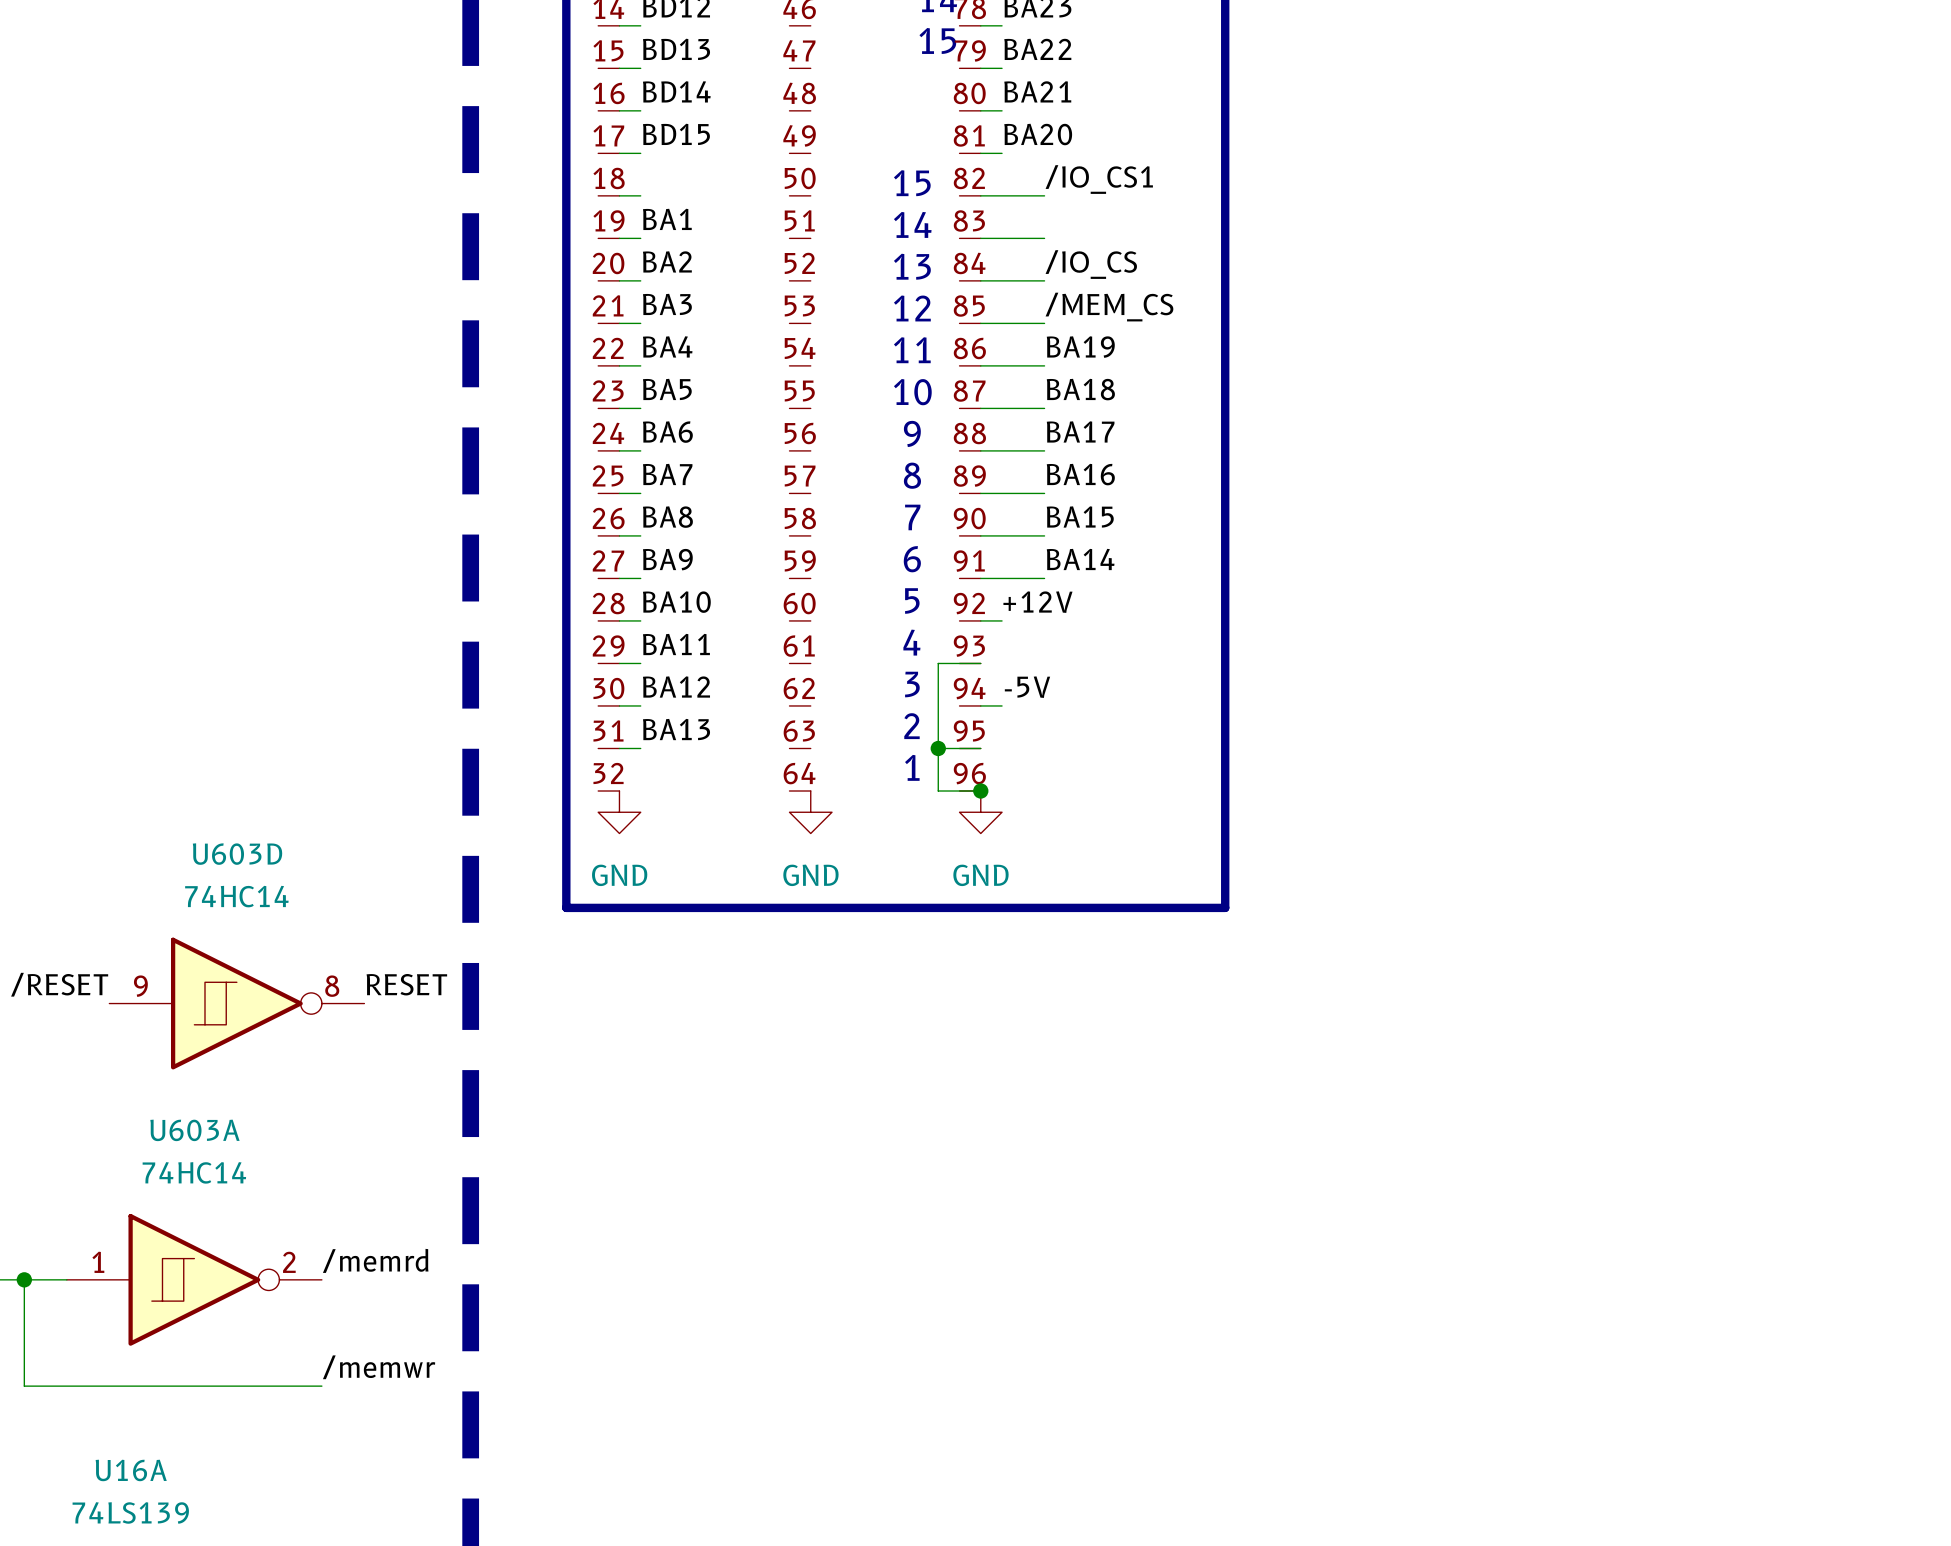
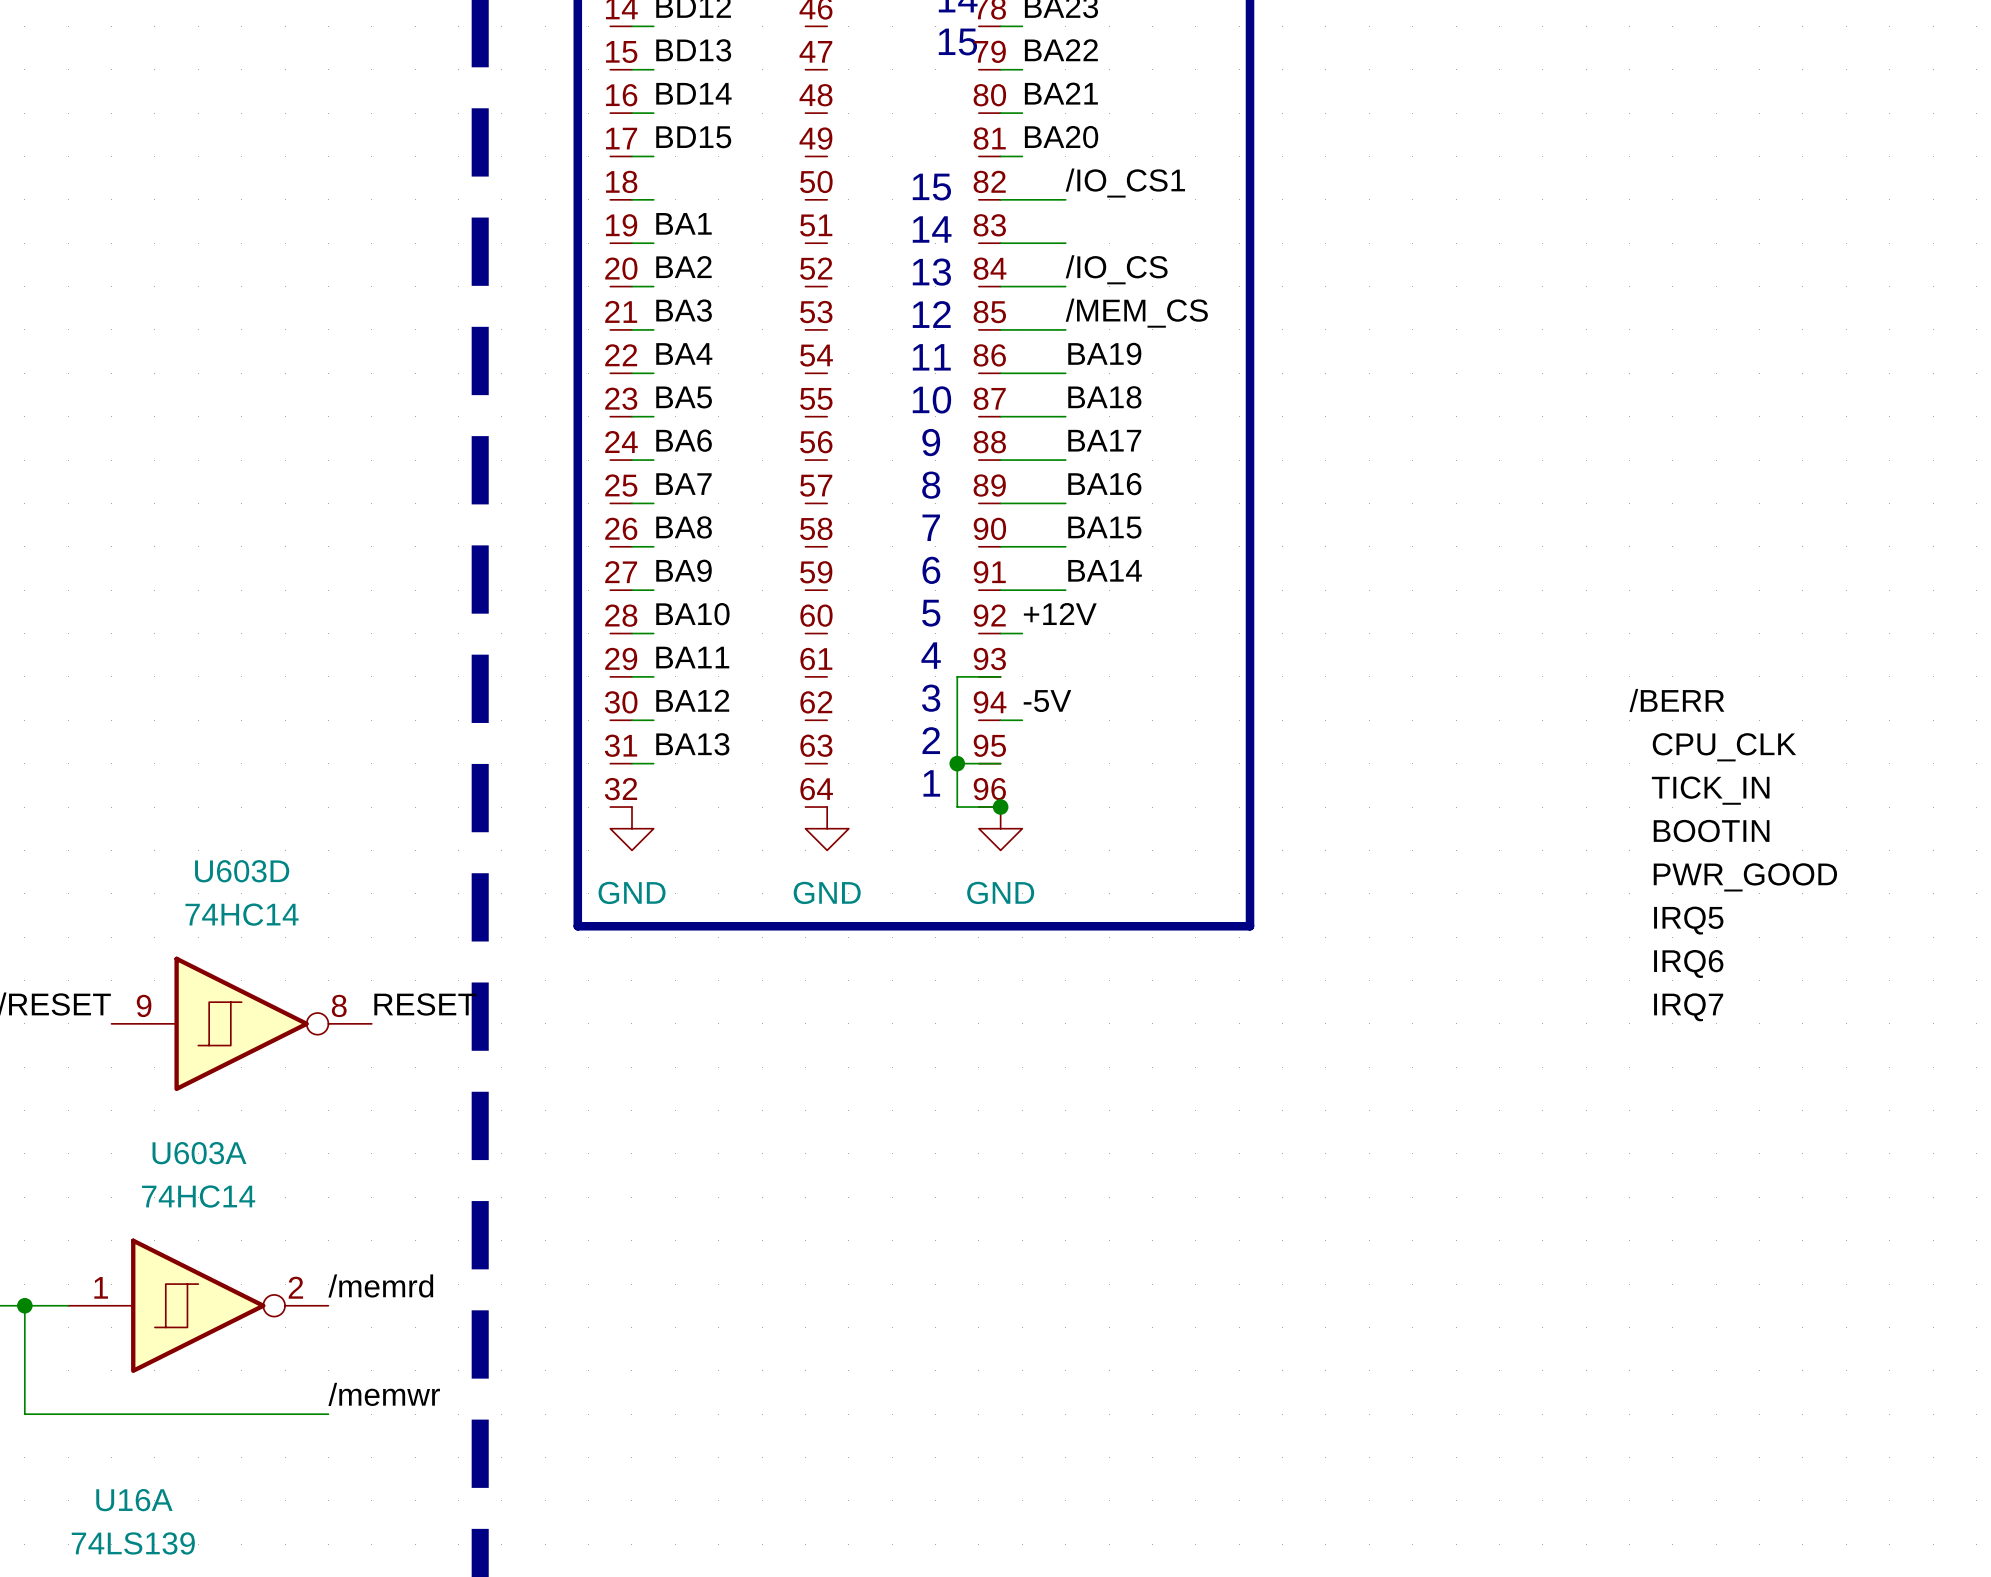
label: none -> /BERR (1676, 700)
label: none -> CPU_CLK (1724, 747)
label: none -> TICK_IN (1710, 790)
label: none -> BOOTIN (1711, 831)
label: none -> PWR_GOOD (1745, 877)
label: none -> IRQ5 (1688, 920)
label: none -> IRQ6 (1688, 963)
label: none -> IRQ7 (1688, 1007)

